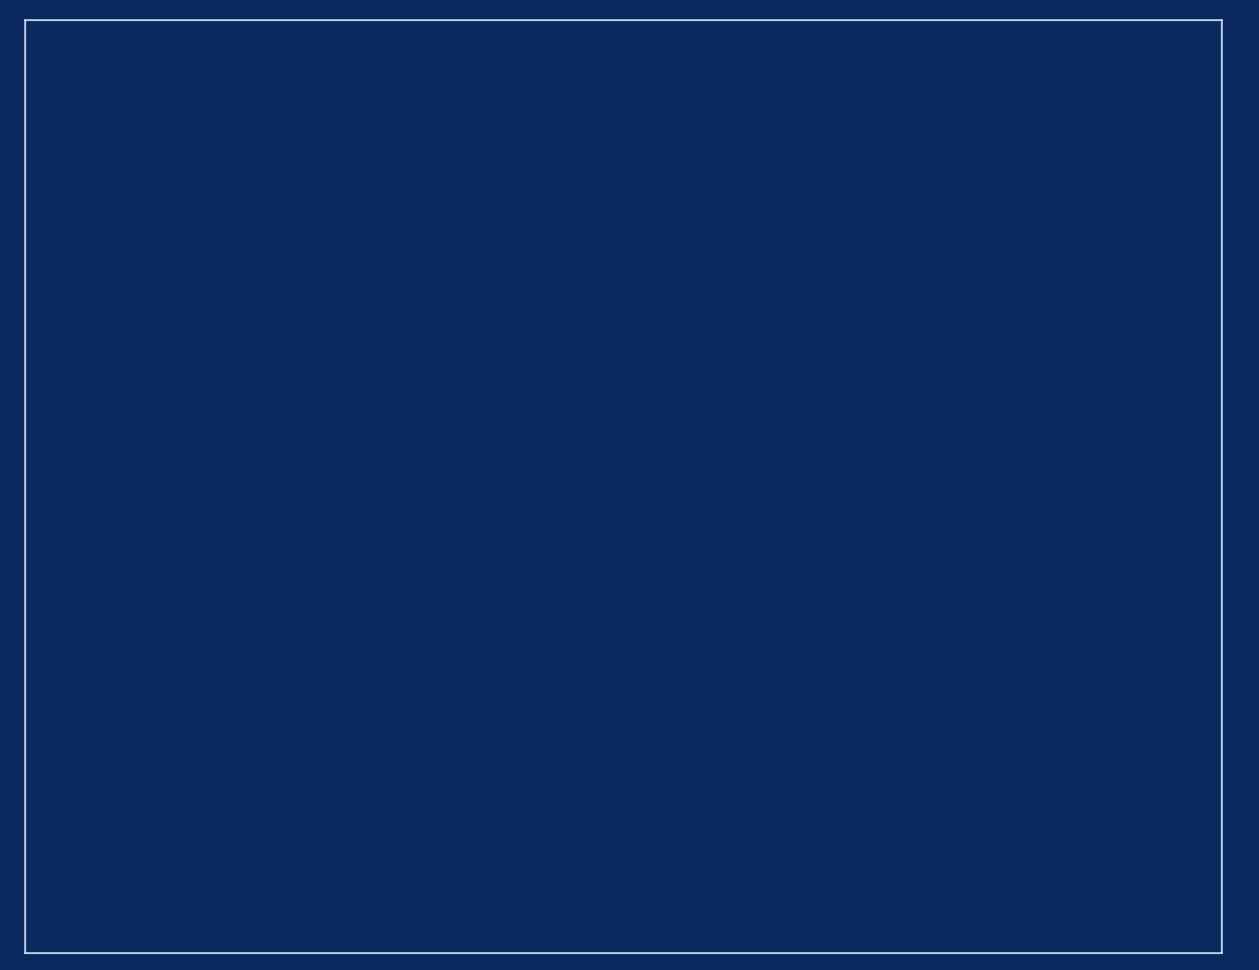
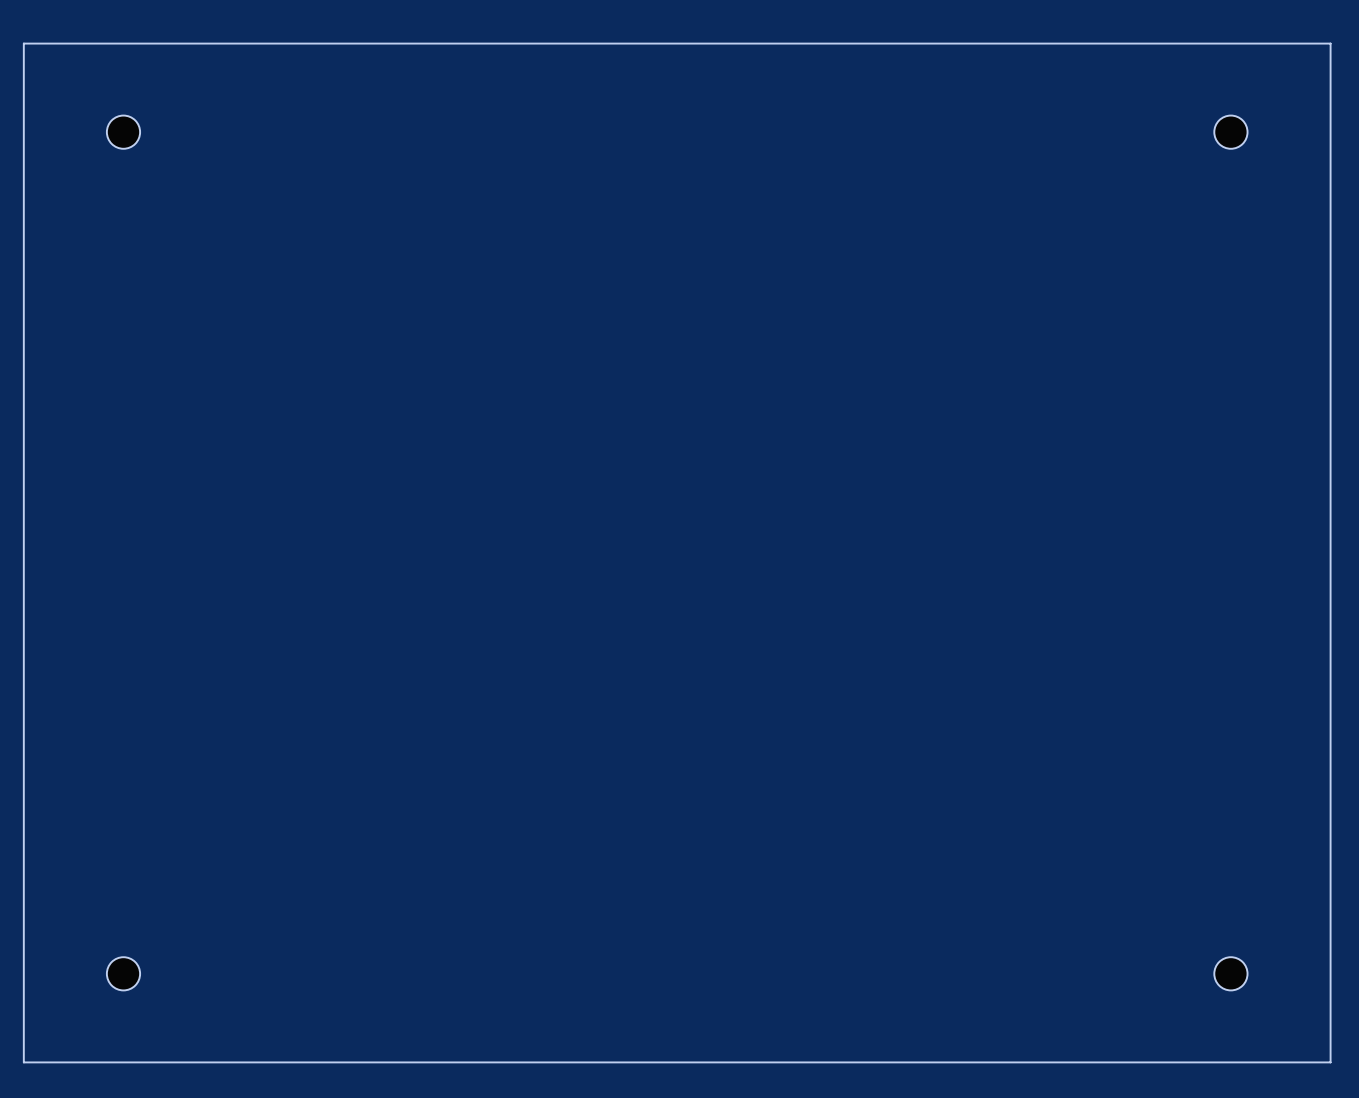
part: none -> (123, 132)
part: none -> (1230, 132)
part: none -> (123, 973)
part: none -> (1230, 973)

